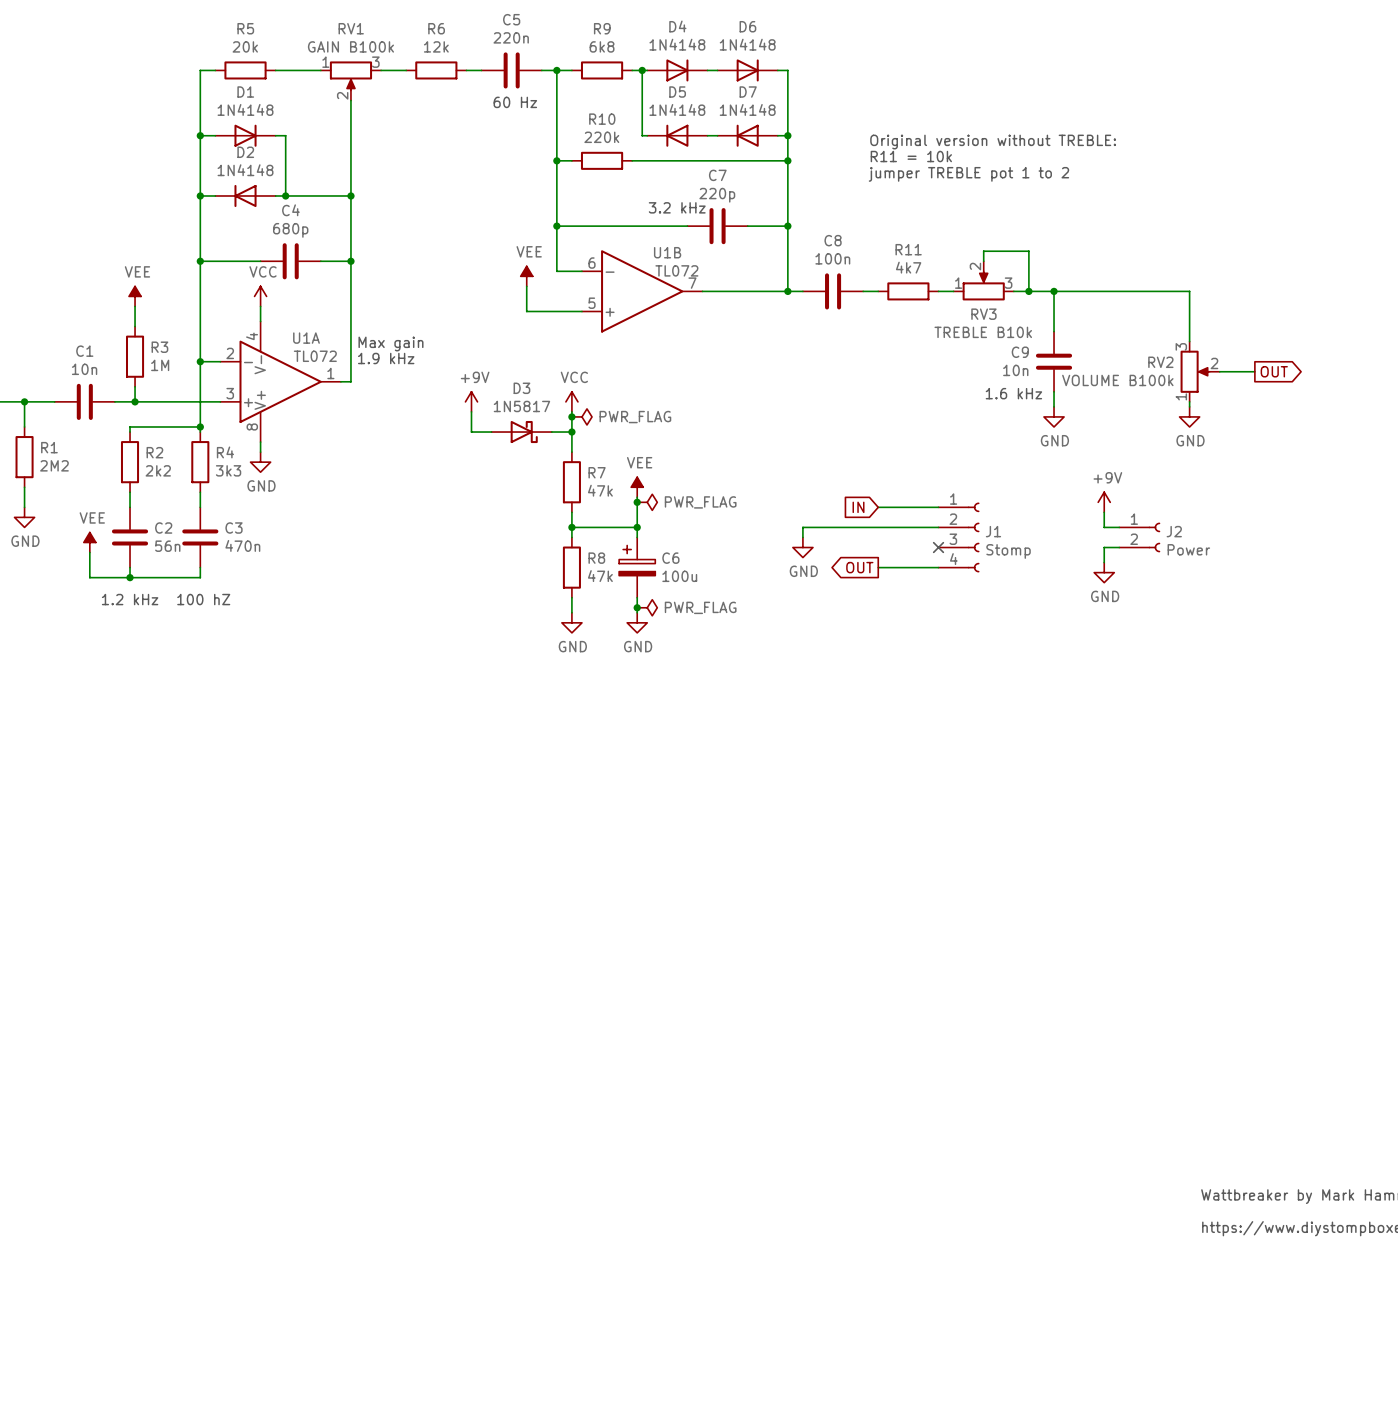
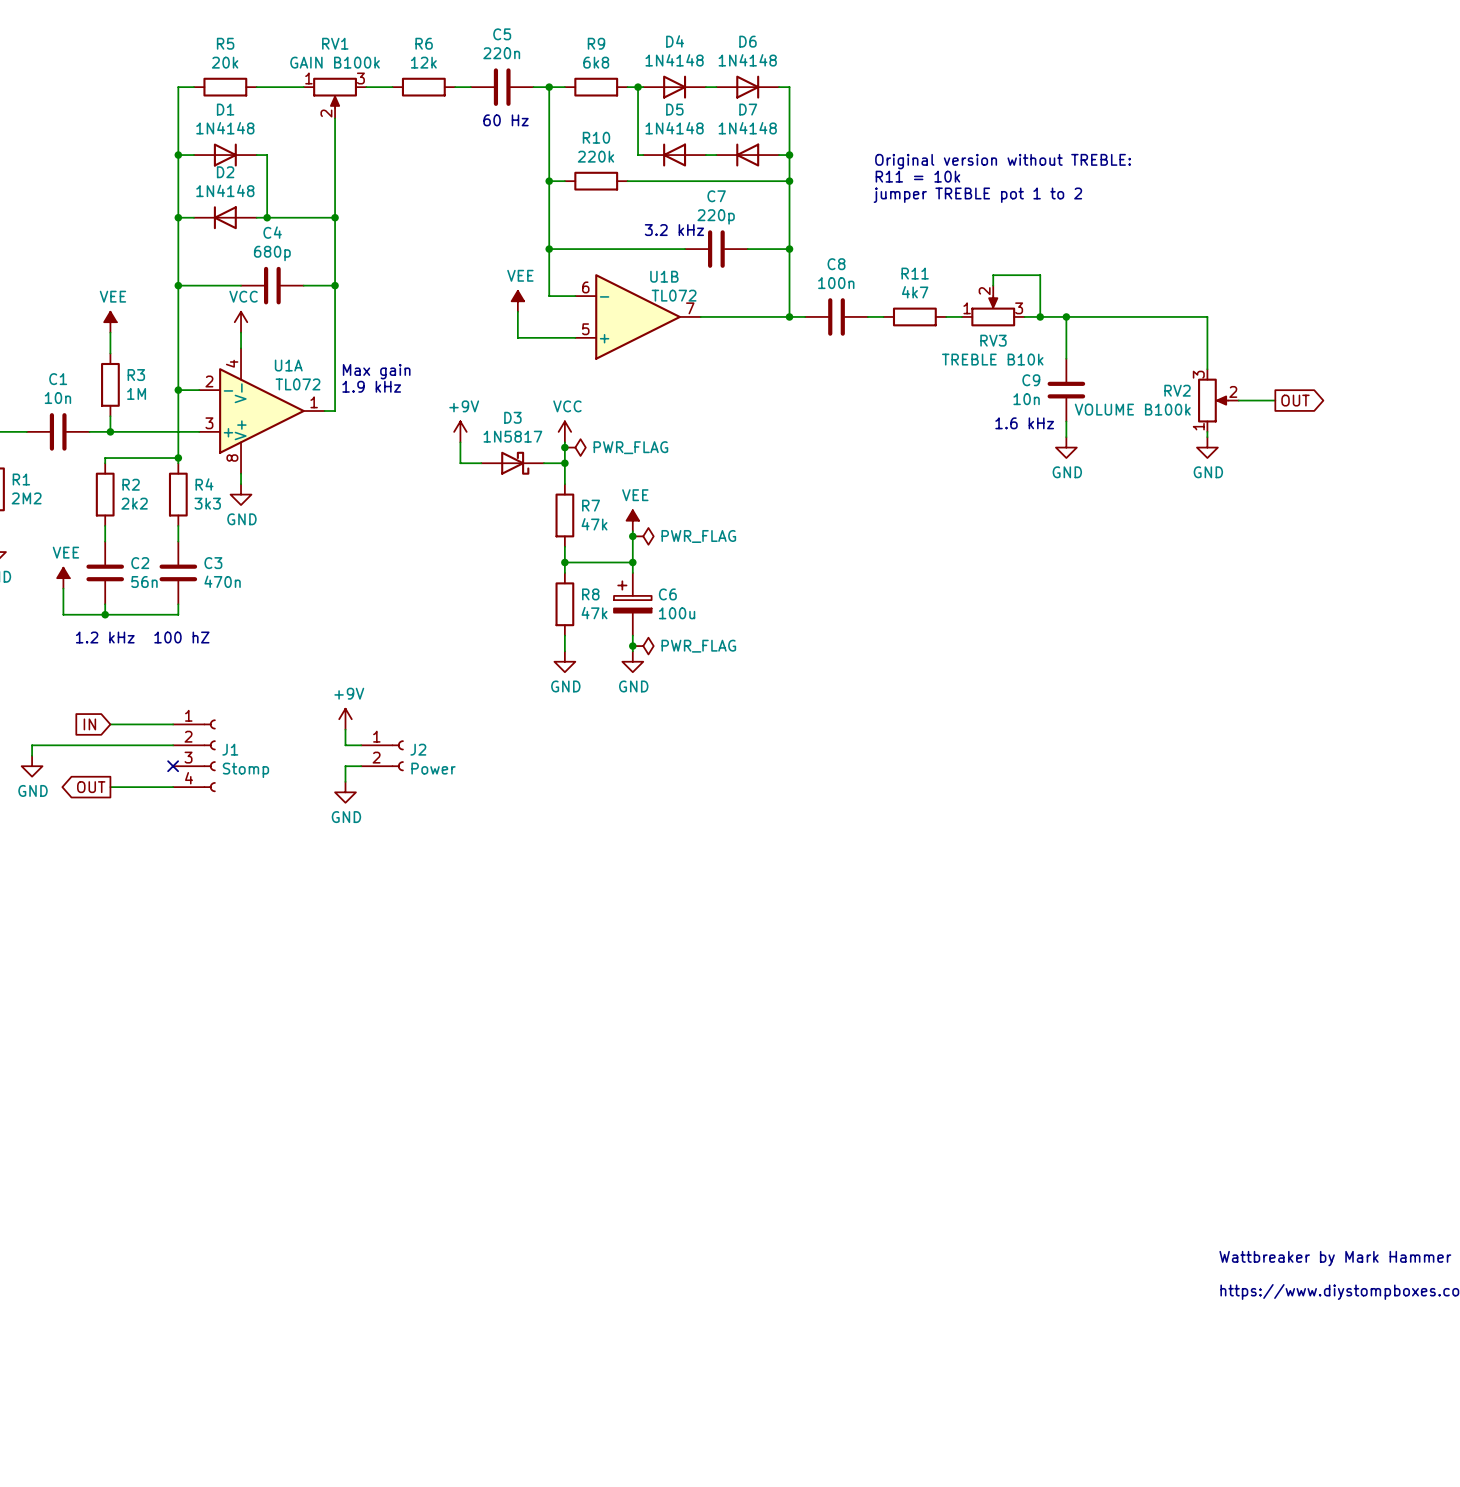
power symbol: +9V (1104, 502) -> none
global label: IN (858, 507) -> none
wire: (878, 507) (938, 507) -> none
wire: (1104, 512) (1104, 527) (1119, 527) -> none
wire: (938, 527) (802, 527) (802, 537) -> none
J1 position: (958, 537) -> (194, 755)
J2 position: (1139, 537) -> (382, 755)
power symbol: GND (802, 547) -> none
no-connect mark: (938, 547) -> none
wire: (1119, 547) (1104, 547) (1104, 562) -> none
global label: OUT (859, 567) -> none
wire: (878, 567) (938, 567) -> none
power symbol: GND (1104, 572) -> none
power symbol: none -> +9V (345, 719)
global label: none -> IN (89, 724)
wire: none -> (110, 724) (173, 724)
wire: none -> (345, 729) (345, 745) (361, 745)
wire: none -> (173, 745) (32, 745) (32, 755)
power symbol: none -> GND (32, 766)
no-connect mark: none -> (173, 766)
wire: none -> (361, 766) (345, 766) (345, 781)
global label: none -> OUT (91, 787)
wire: none -> (110, 787) (173, 787)
power symbol: none -> GND (345, 792)

